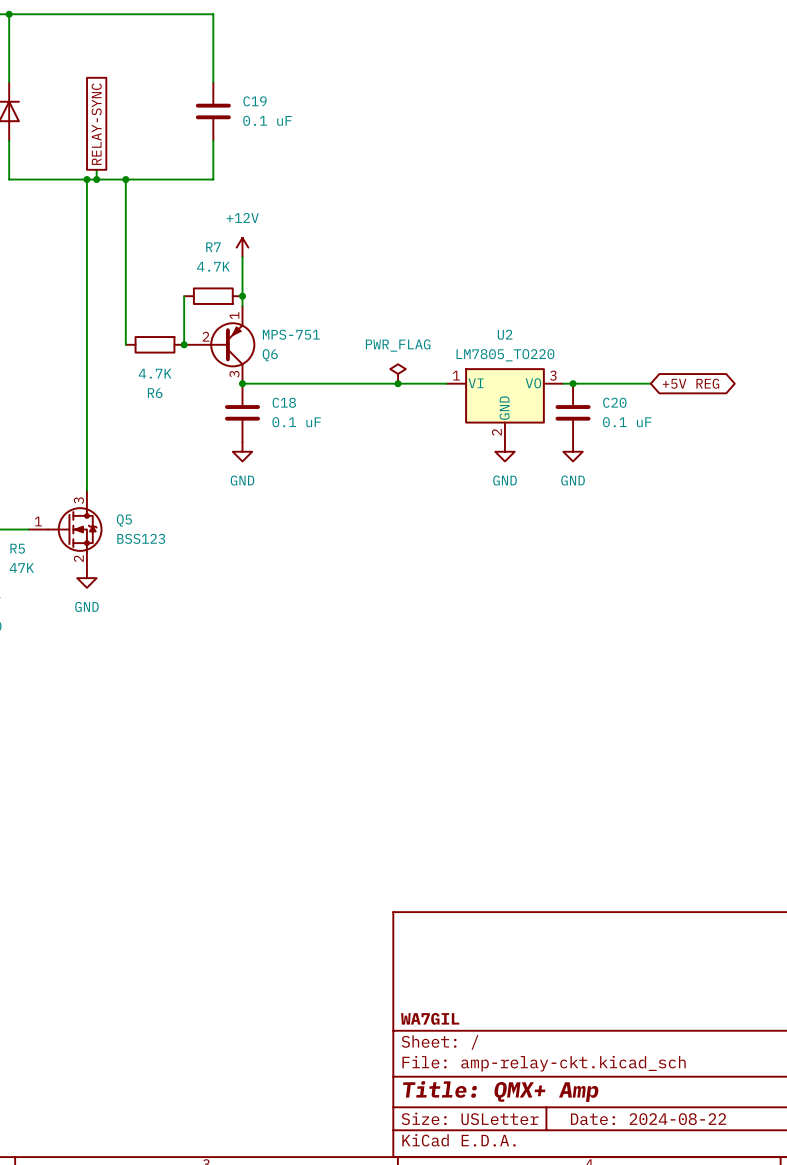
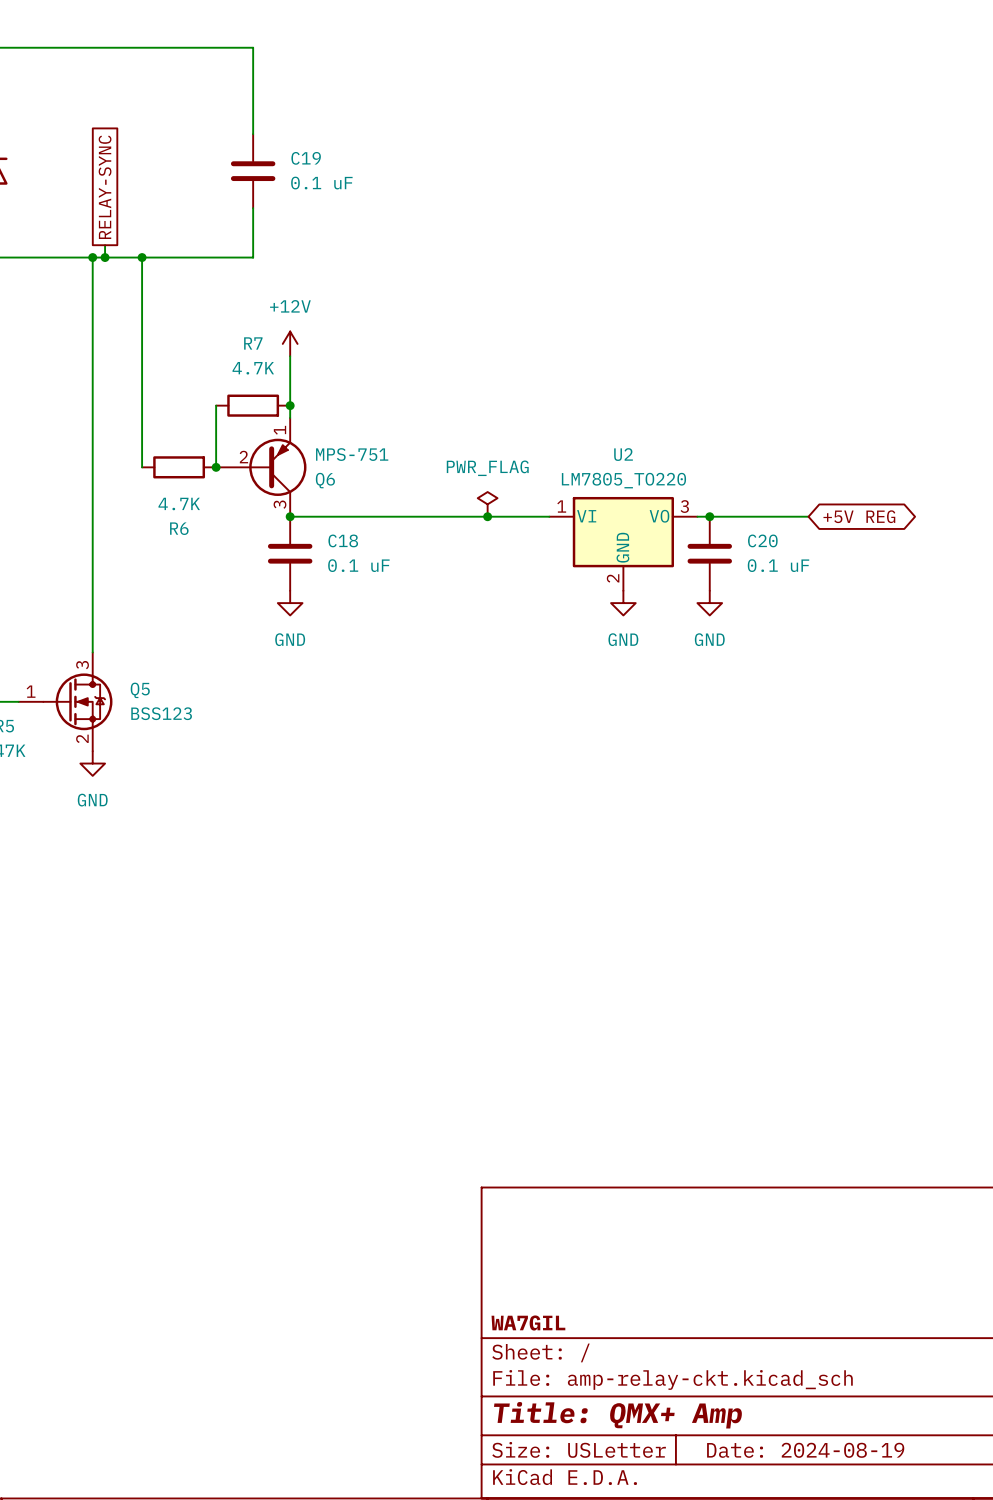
title block: Date: 2024-08-22 (648, 1119) -> Date: 2024-08-19 (805, 1450)

